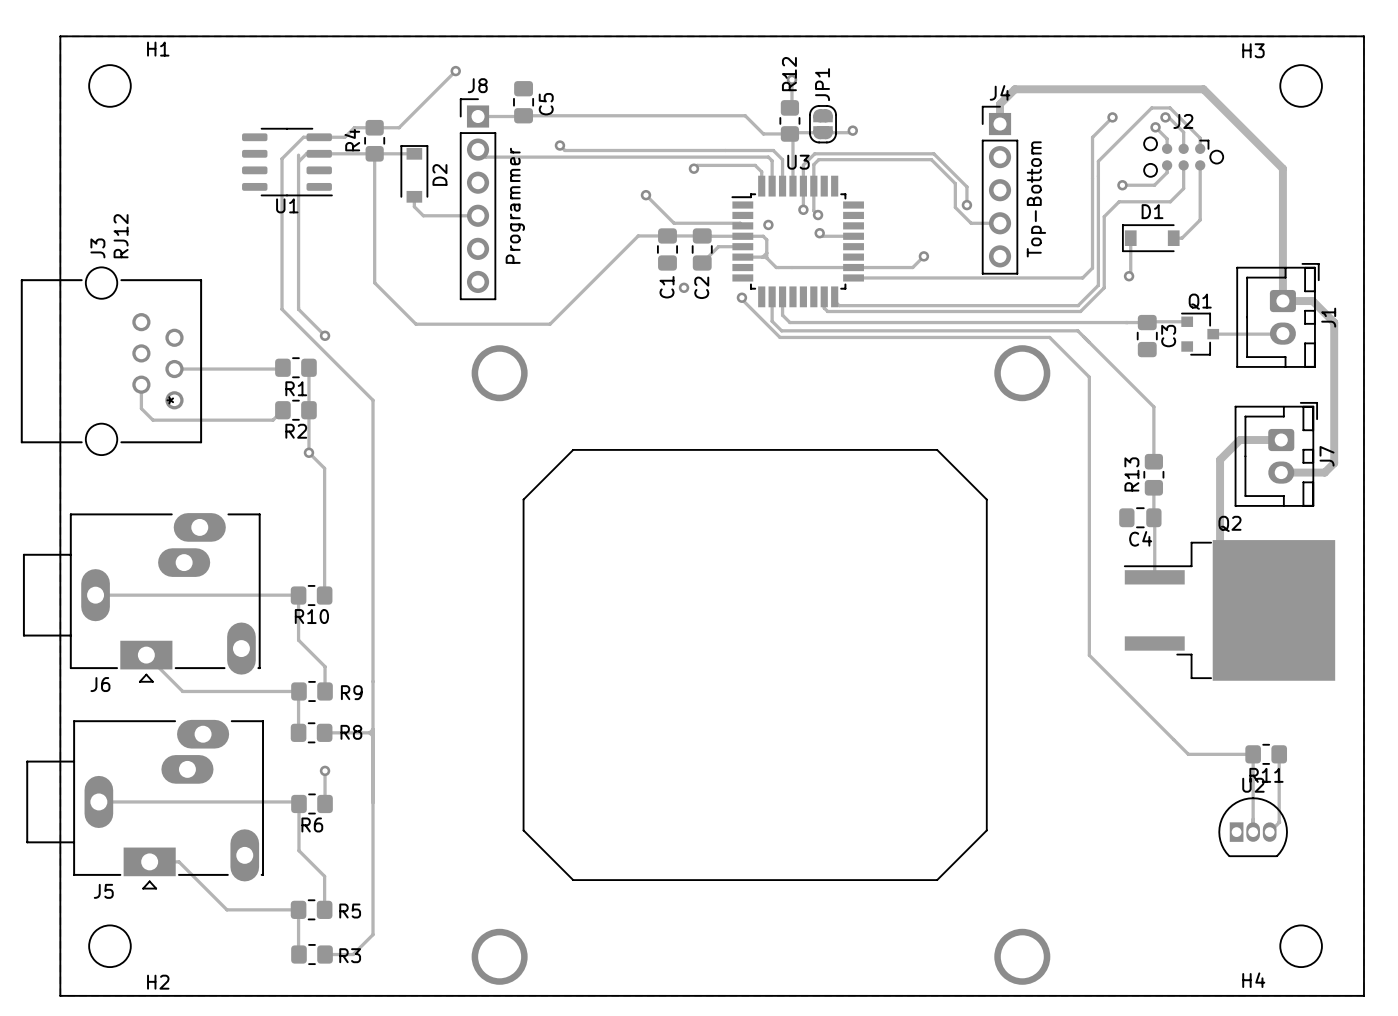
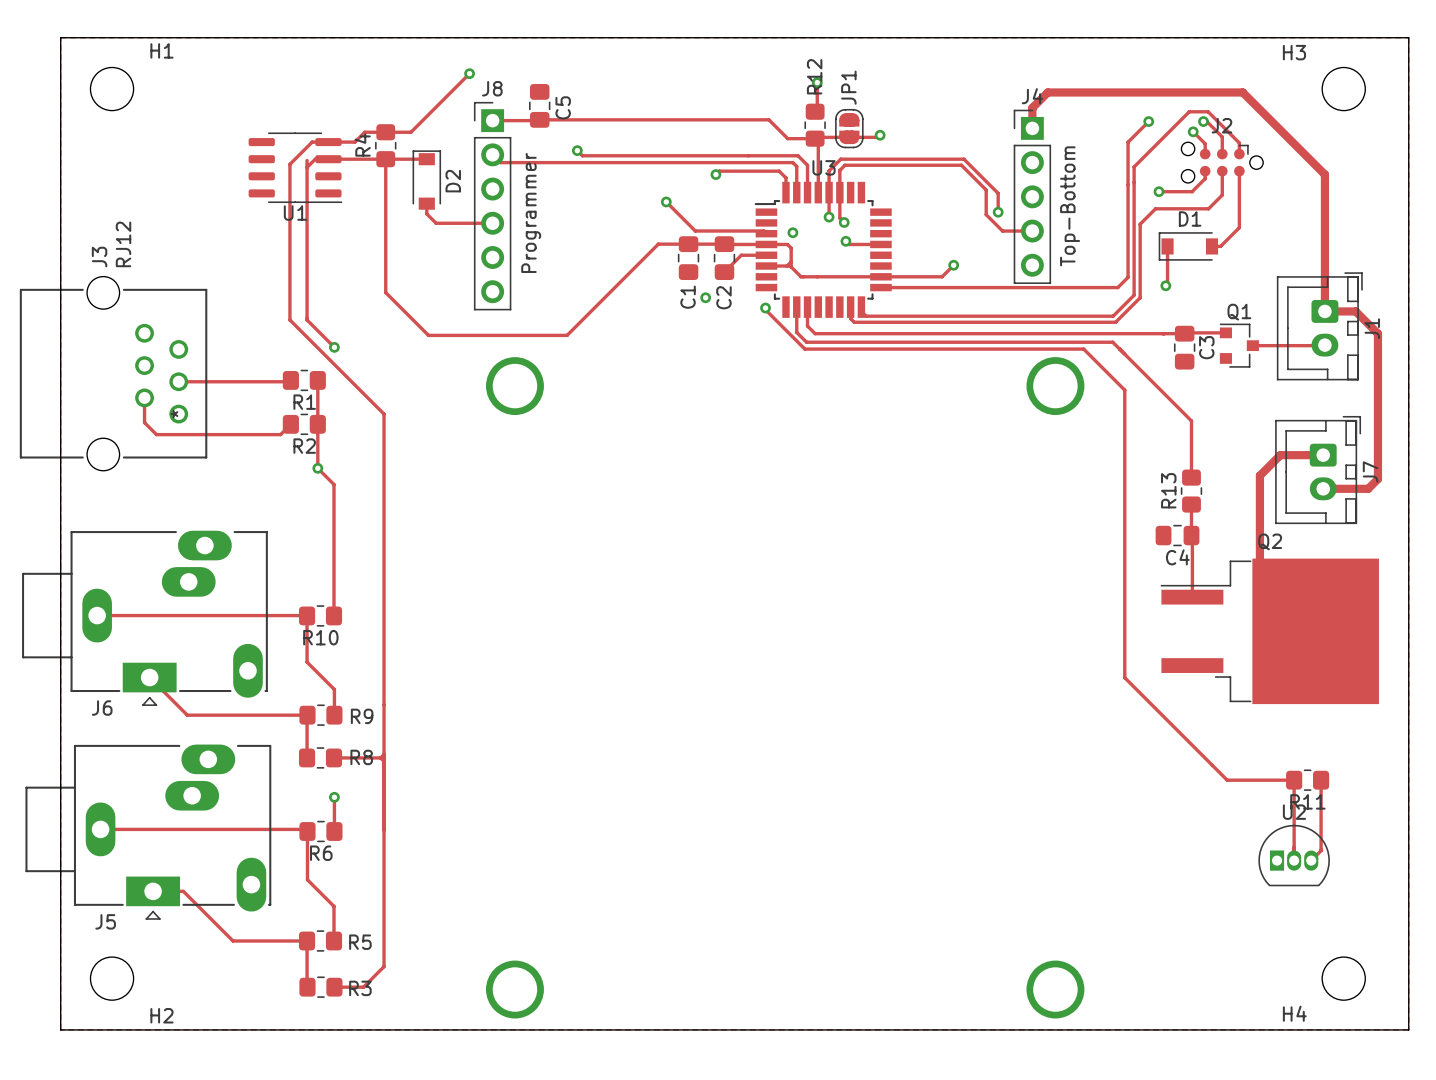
board edge: (573, 449) (523, 499) (523, 830) (573, 880) (937, 880) (986, 830) (986, 499) (937, 449) (573, 449) -> none

